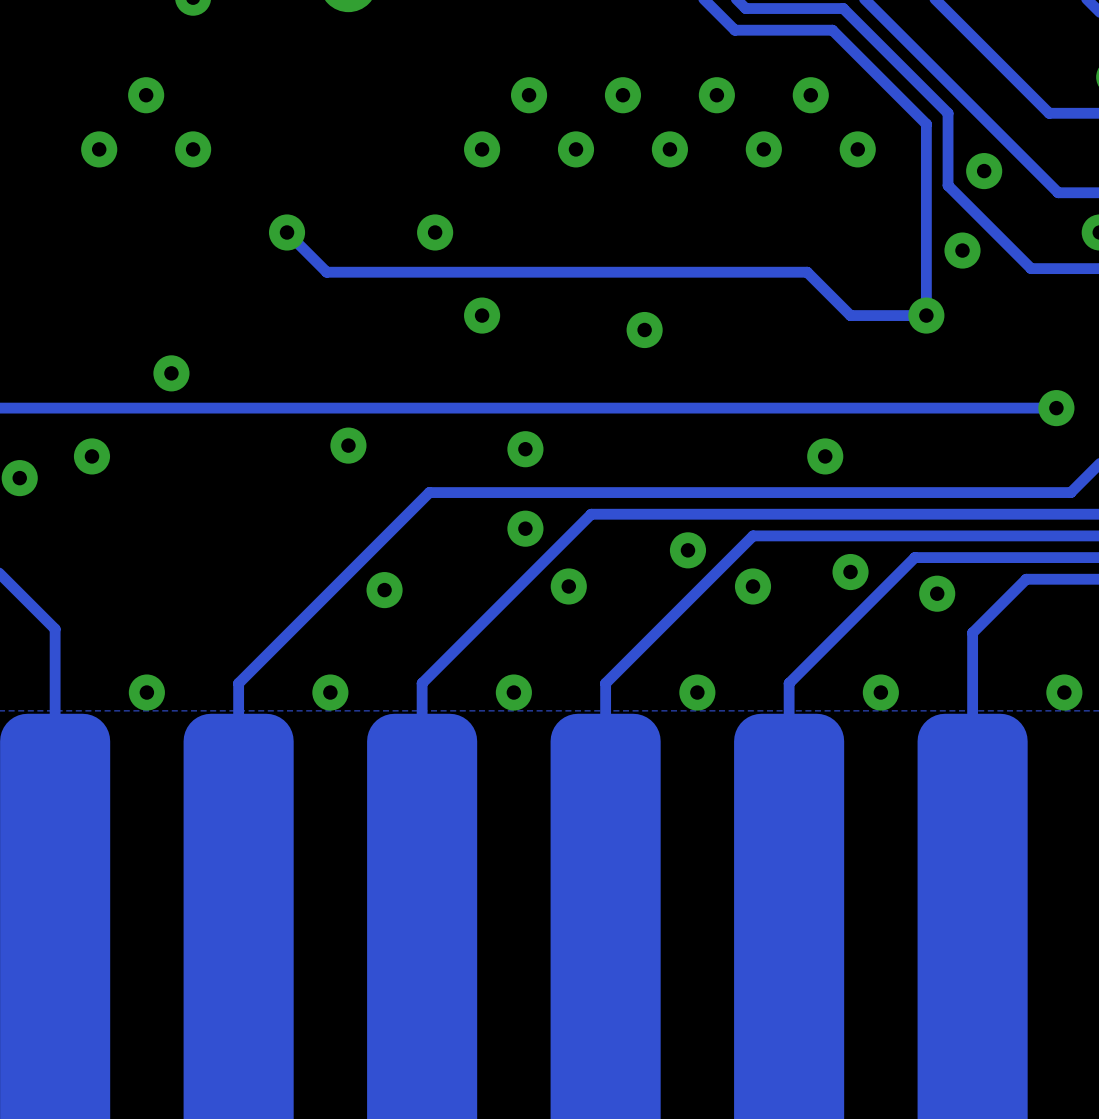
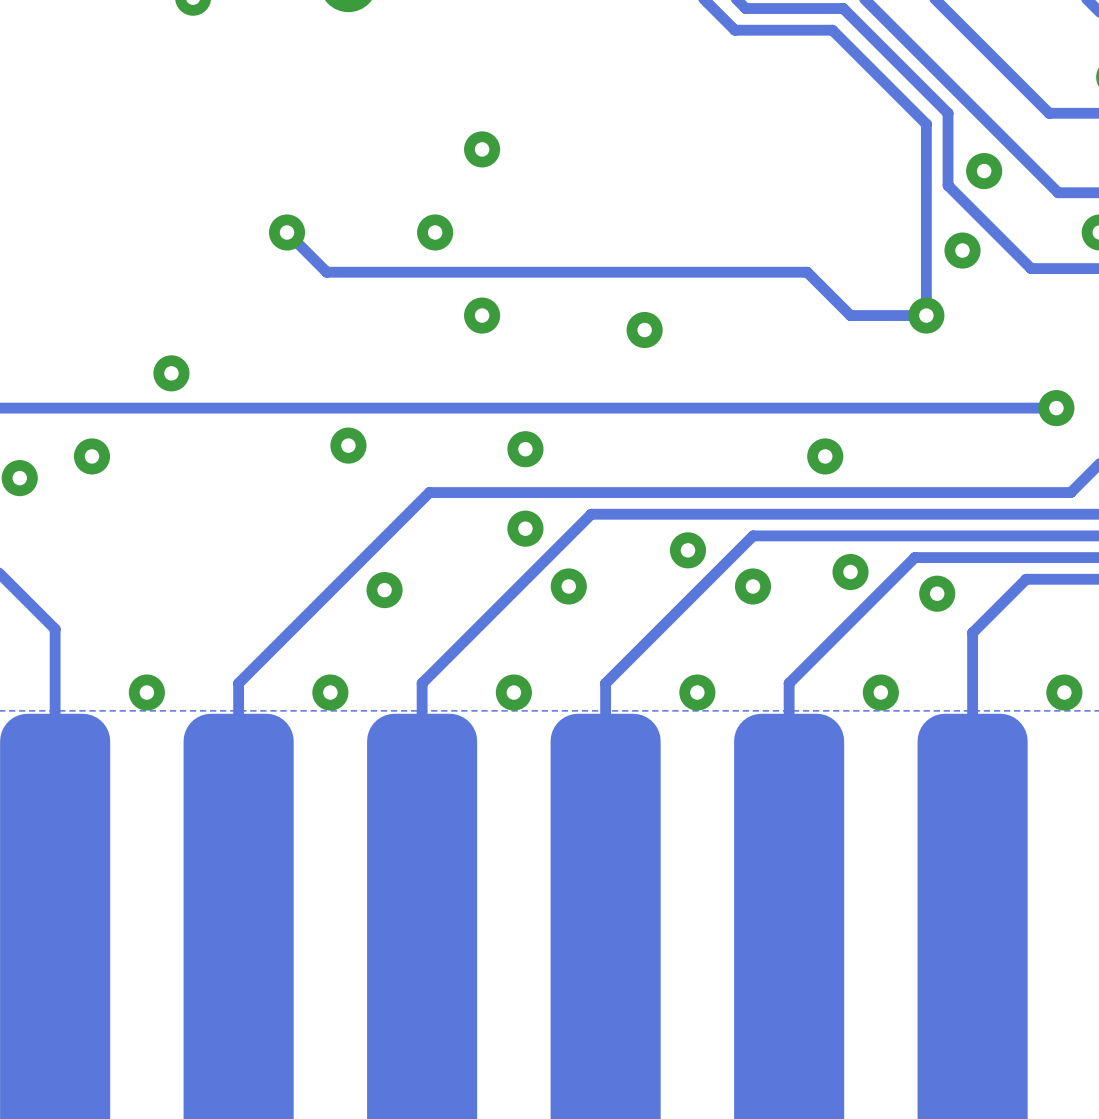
via: (146, 95) -> none
via: (529, 95) -> none
via: (622, 95) -> none
via: (716, 95) -> none
via: (810, 95) -> none
via: (99, 149) -> none
via: (193, 149) -> none
via: (576, 149) -> none
via: (669, 149) -> none
via: (763, 149) -> none
via: (857, 149) -> none

